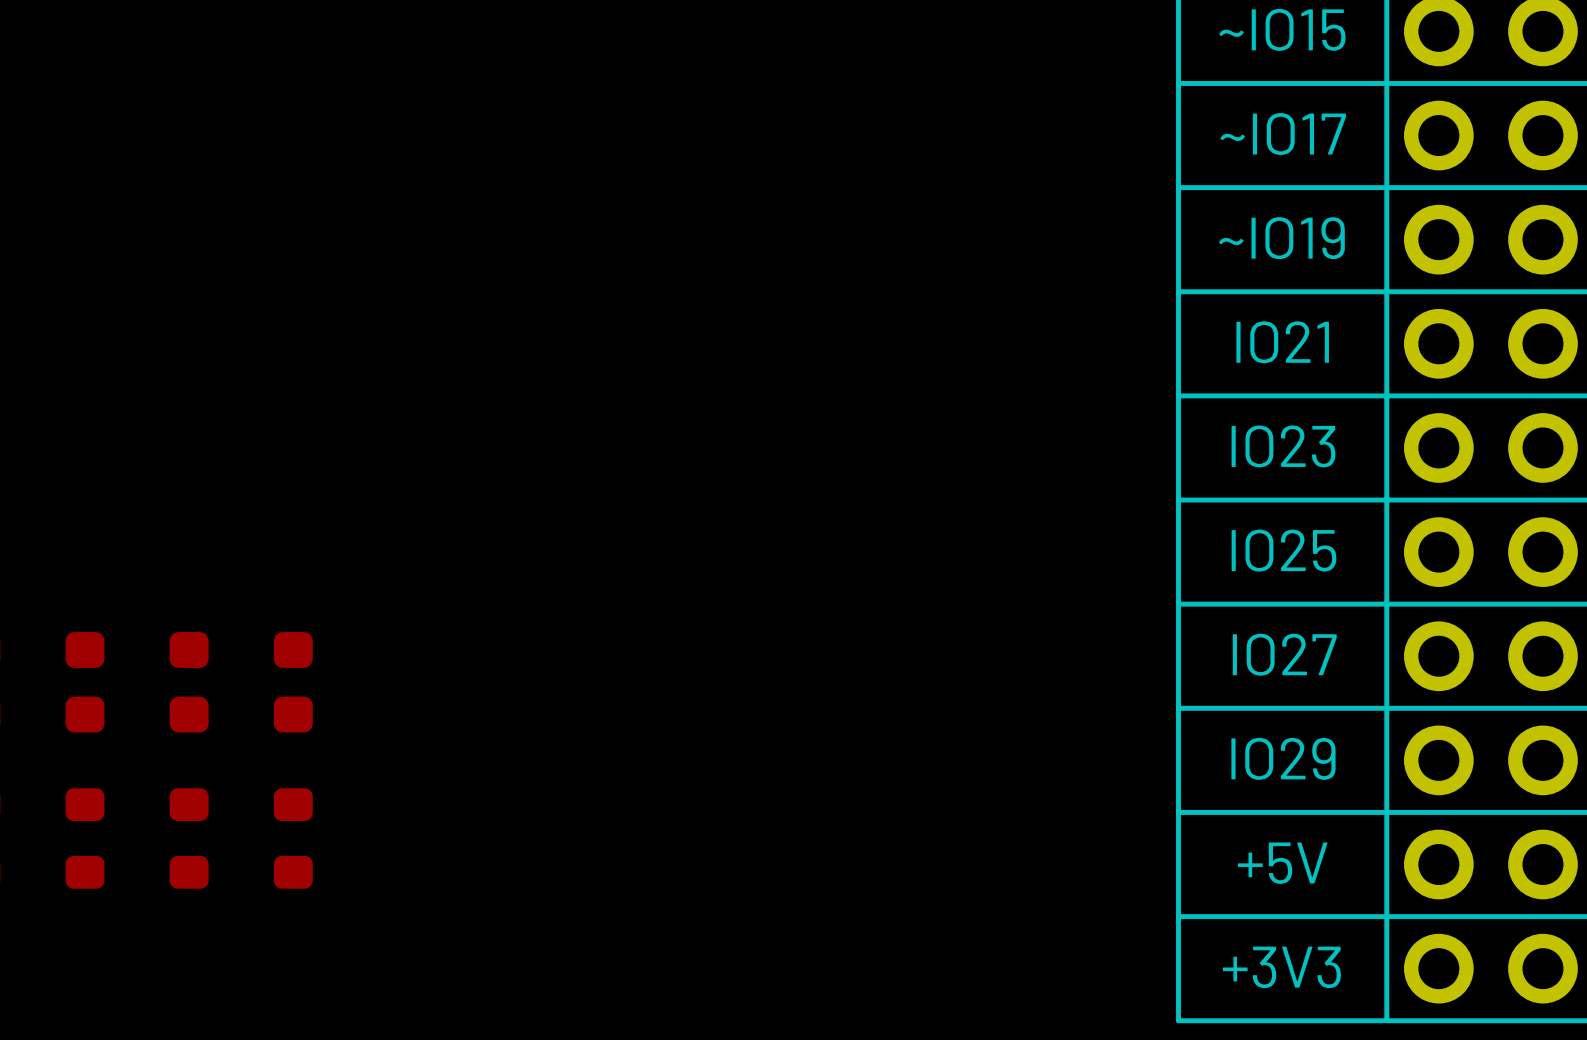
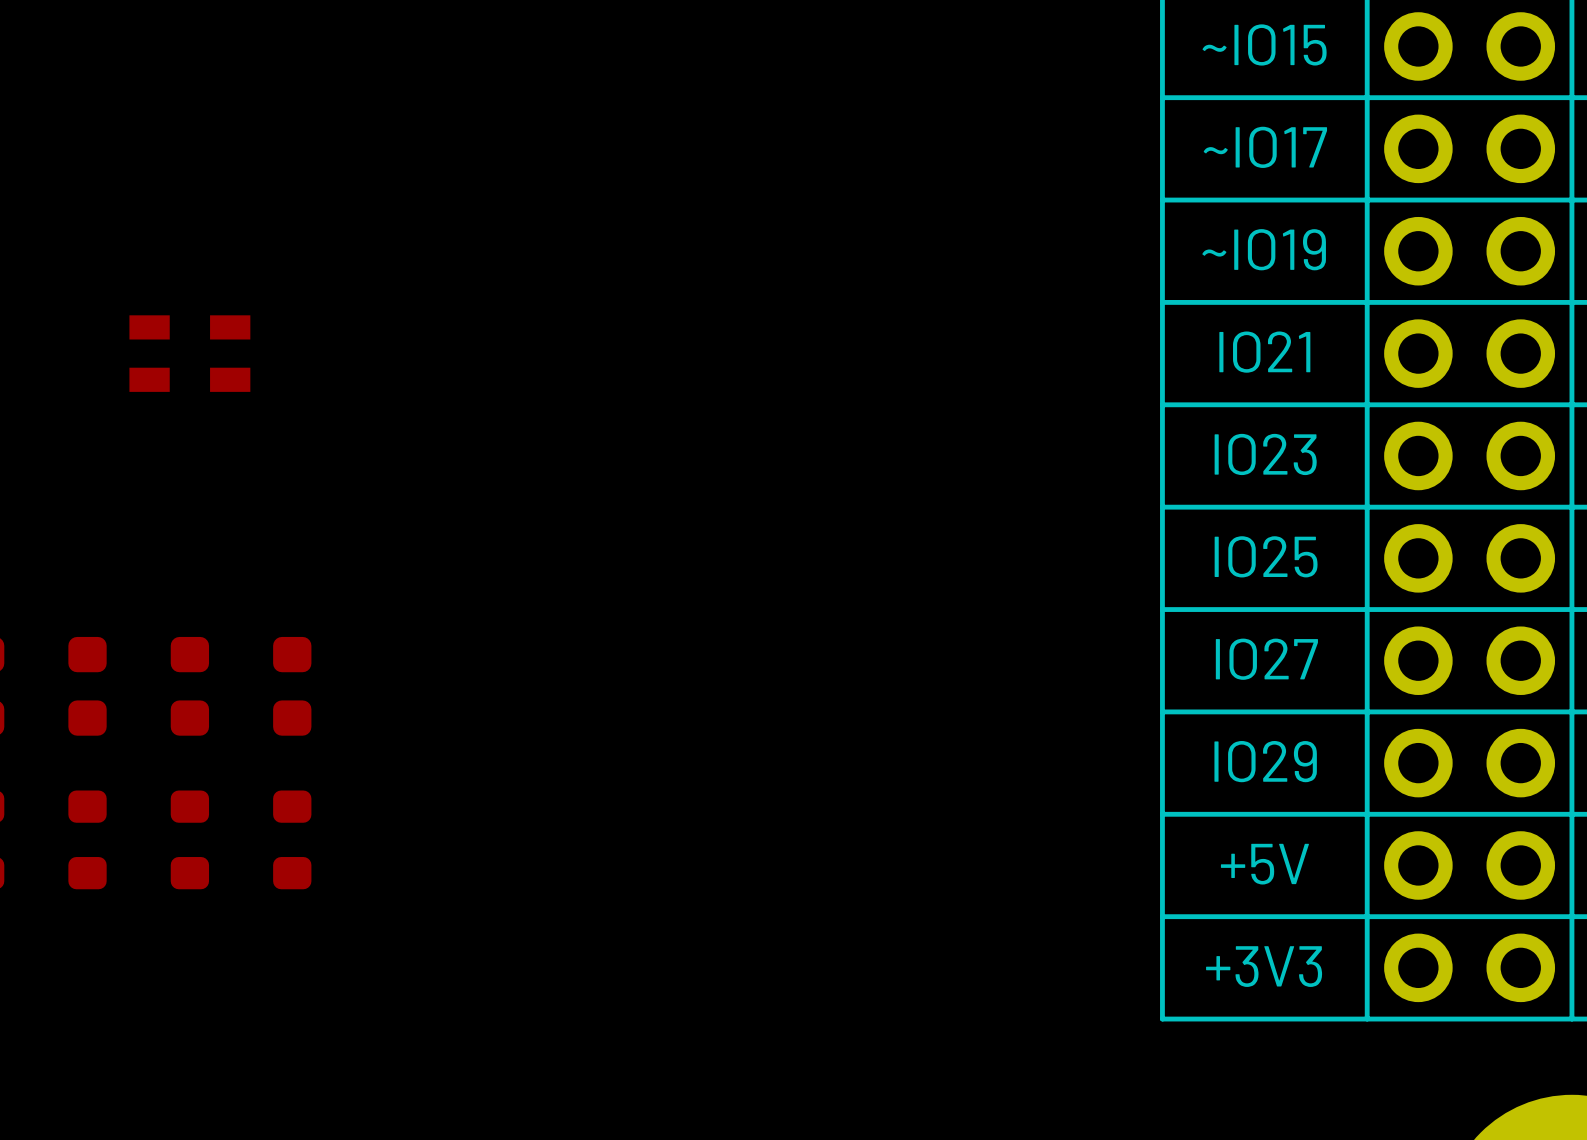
part: none -> (189, 353)

